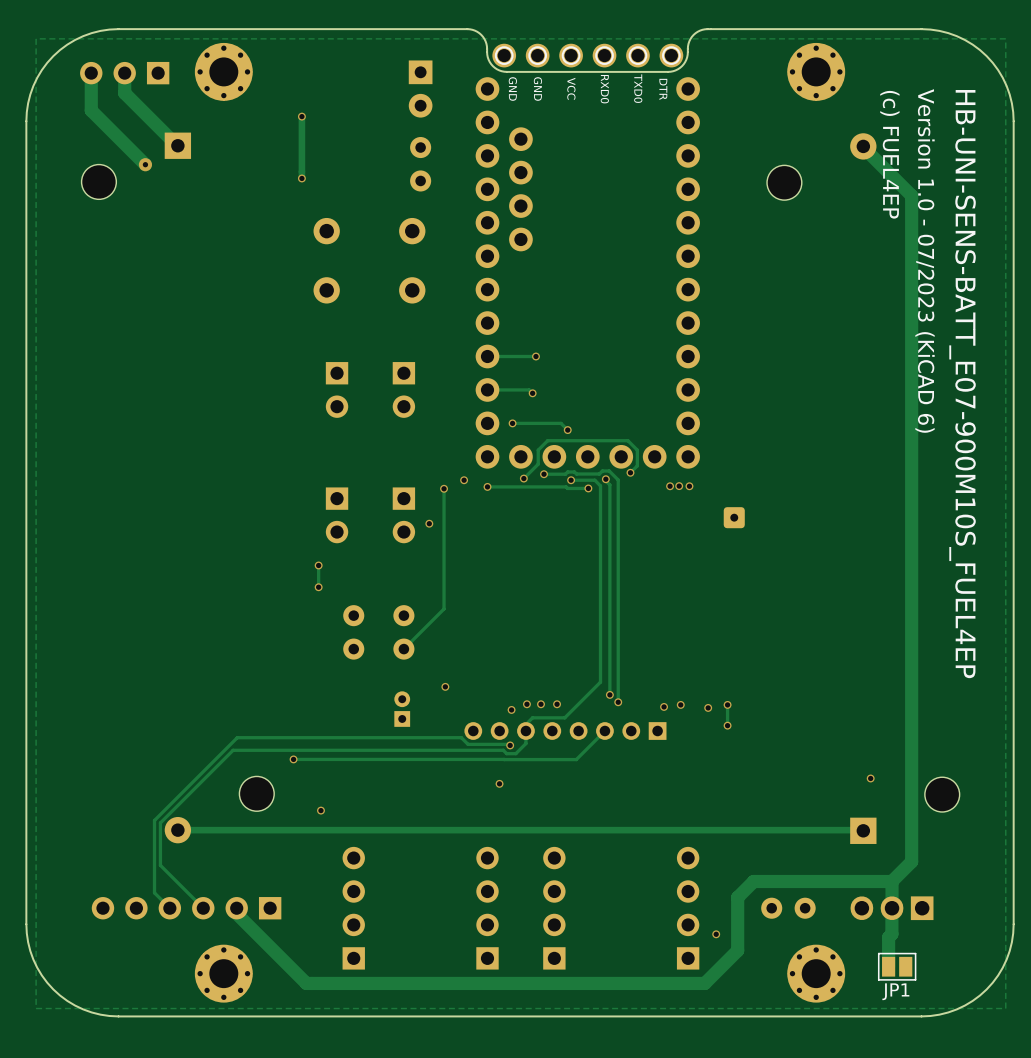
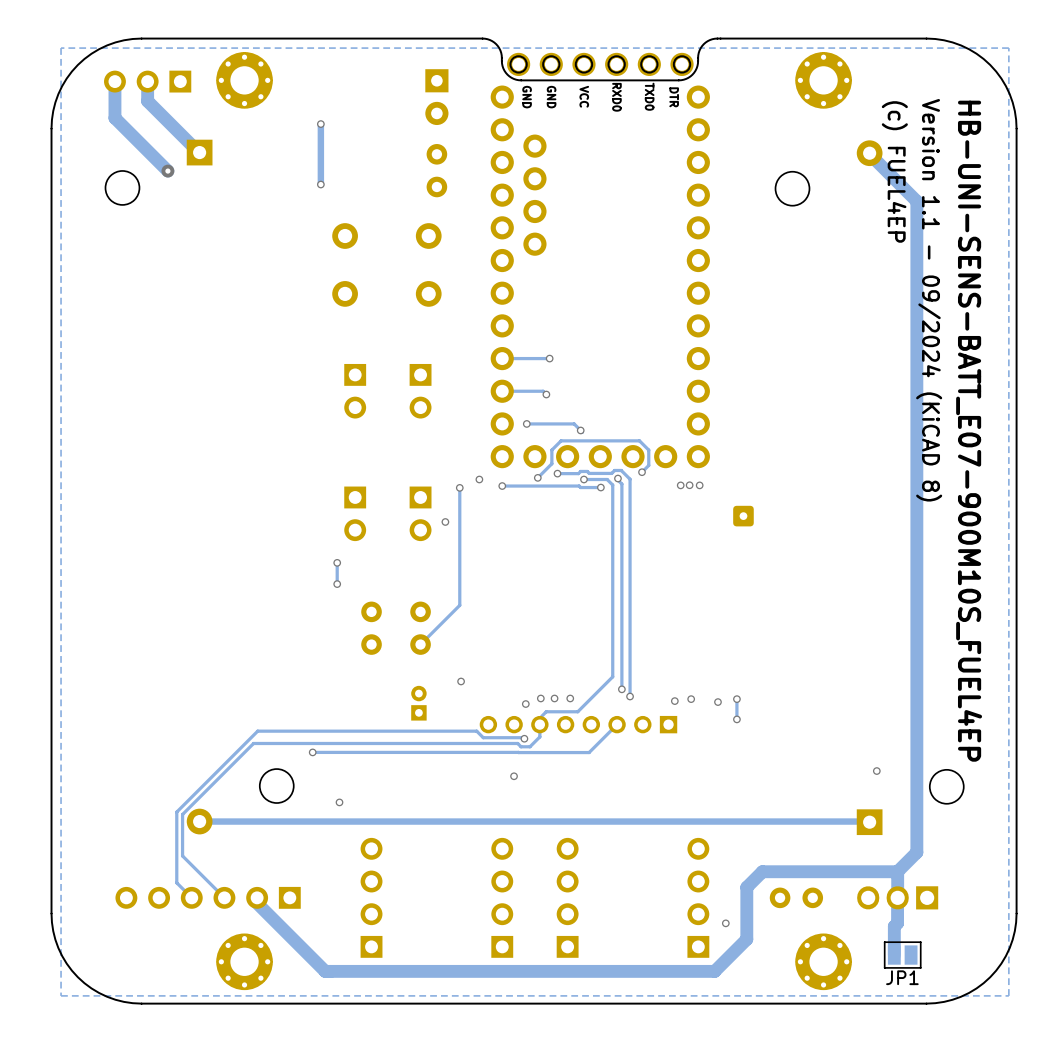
text: Version 1.0 - 07/2023 (KiCAD 6) (925, 260) -> Version 1.1 - 09/2024 (KiCAD 8) (929, 300)

